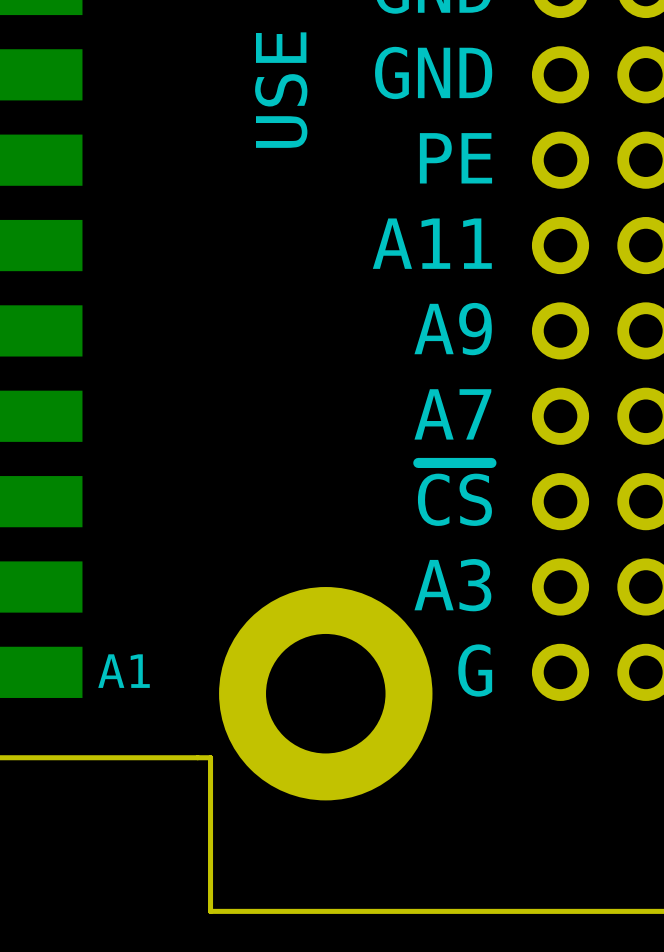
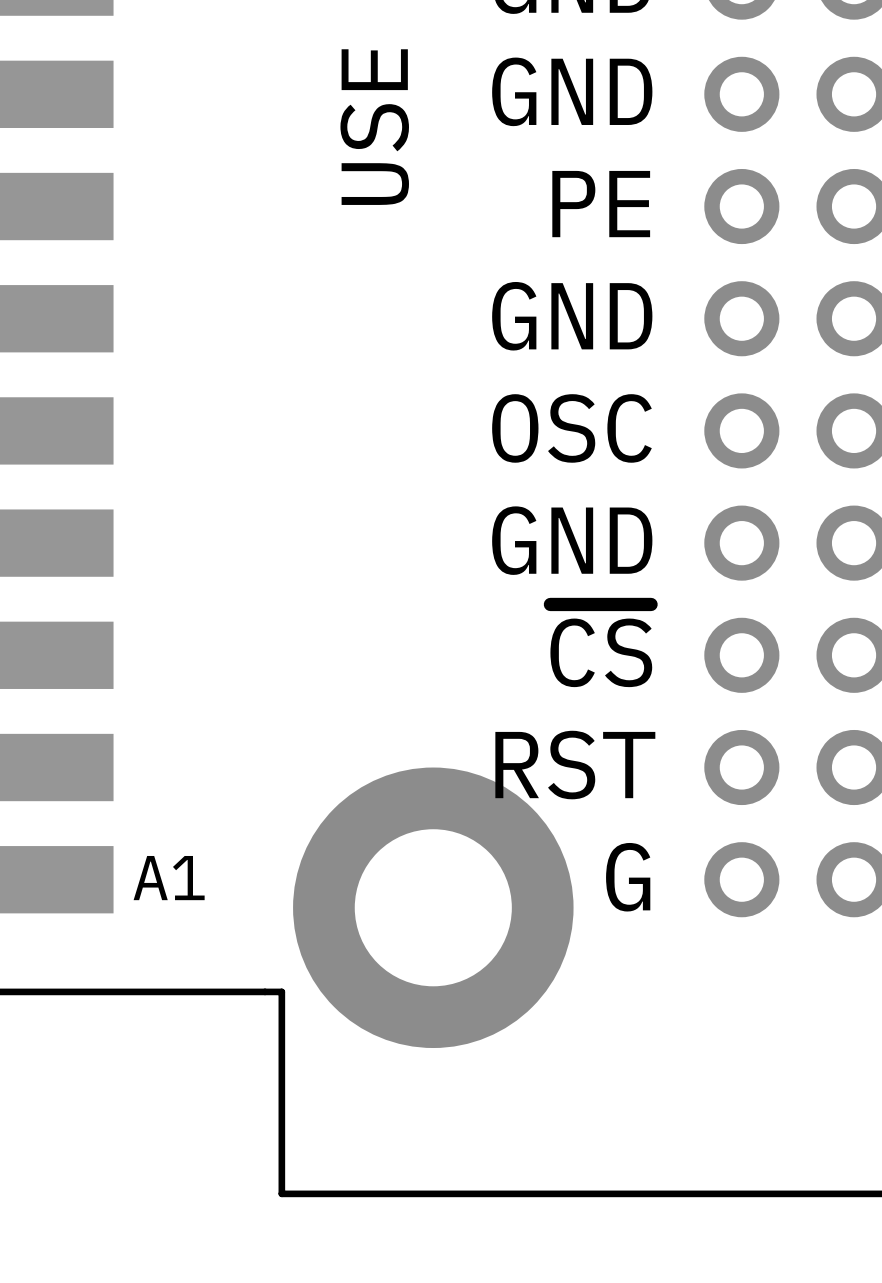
text: A11 (432, 243) -> GND (572, 316)
text: A9 (453, 329) -> OSC (571, 428)
text: A7 (452, 414) -> GND (572, 540)
text: A3 (452, 585) -> RST (575, 765)

